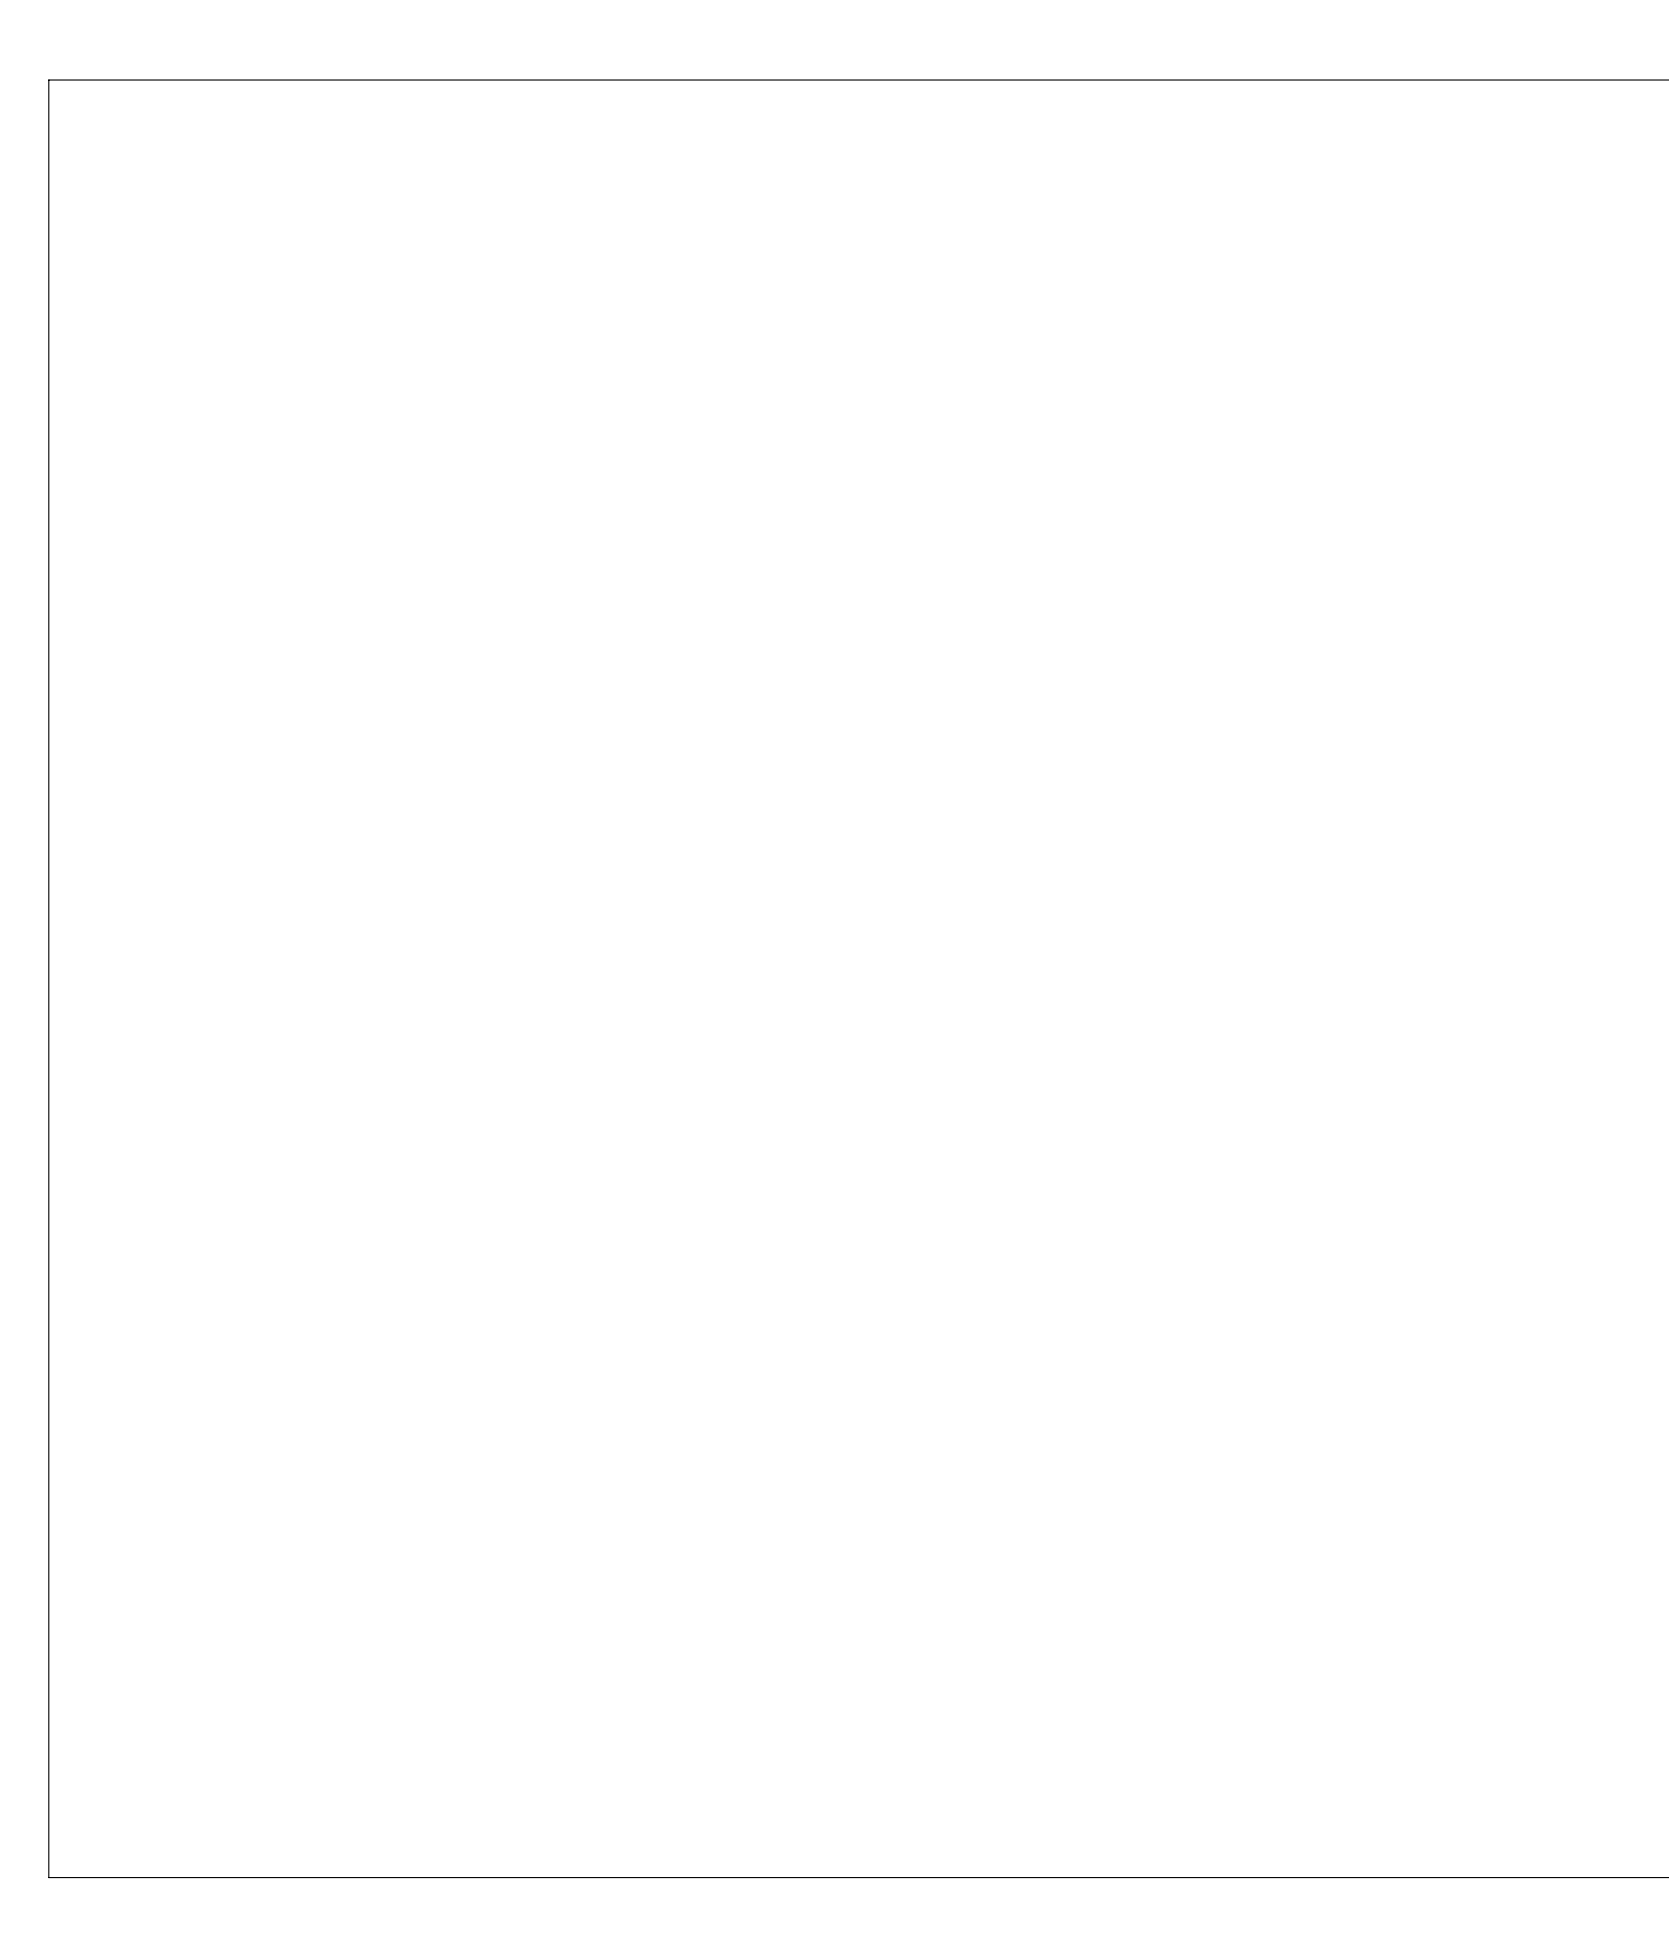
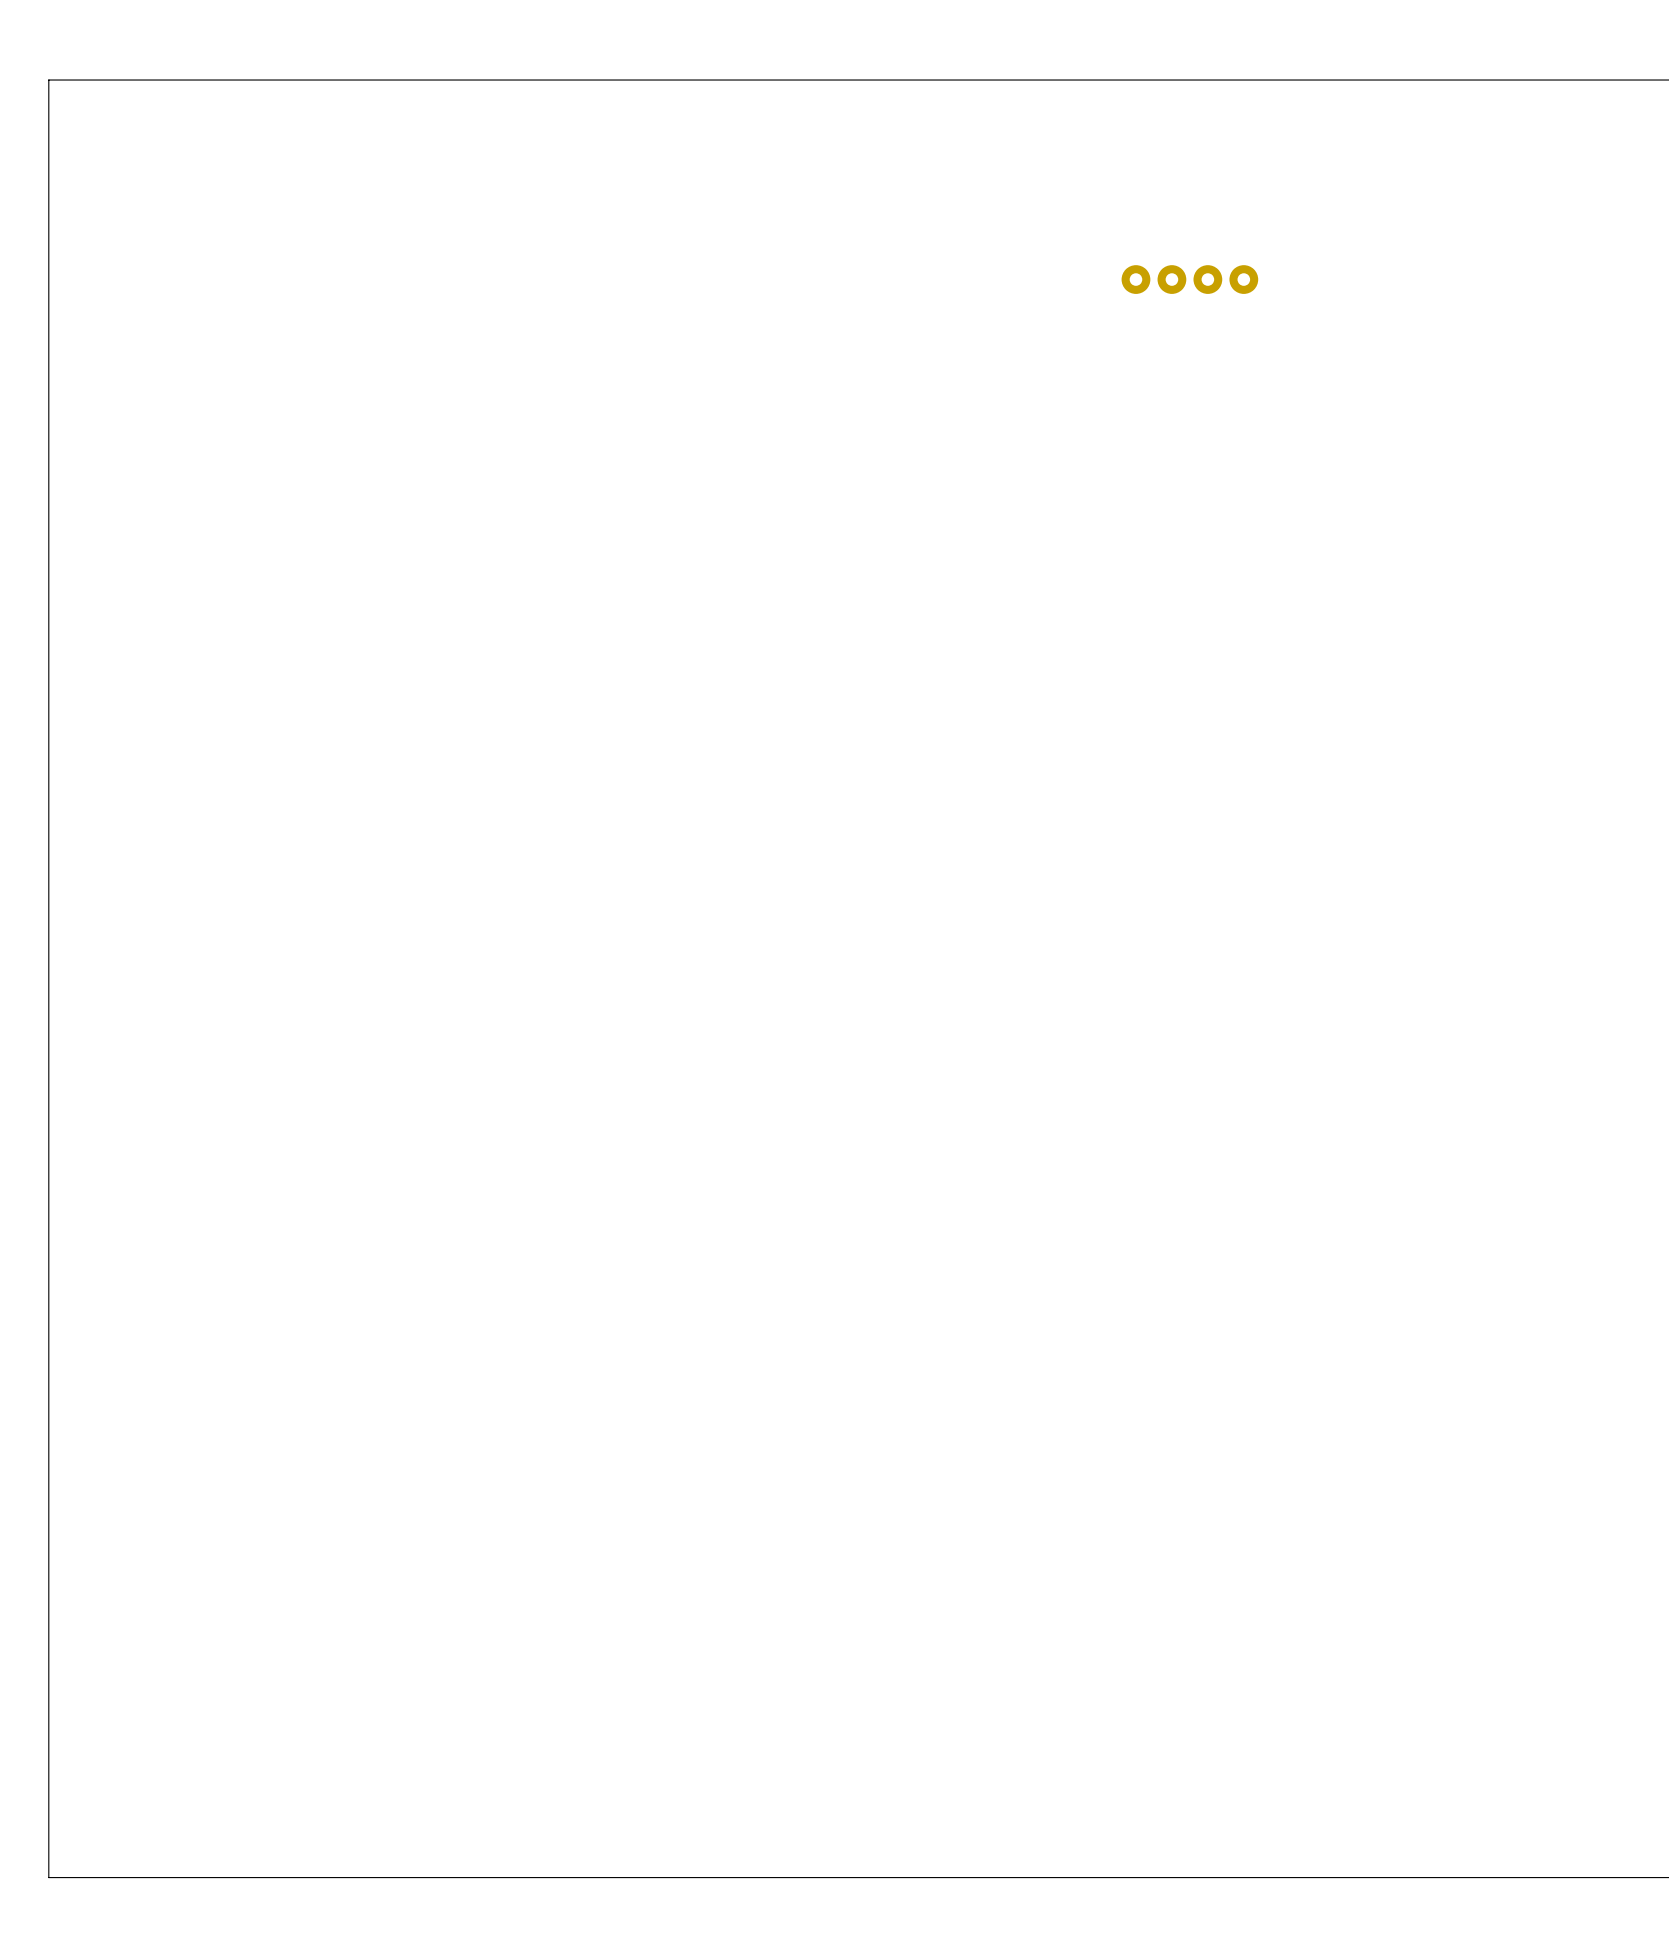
part: none -> (1189, 279)

